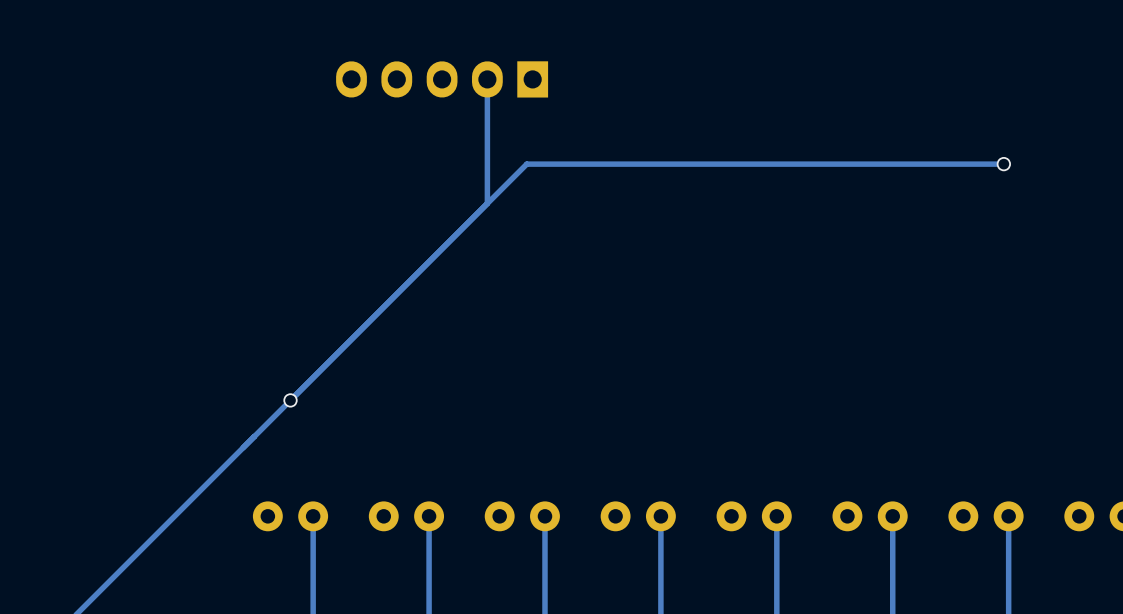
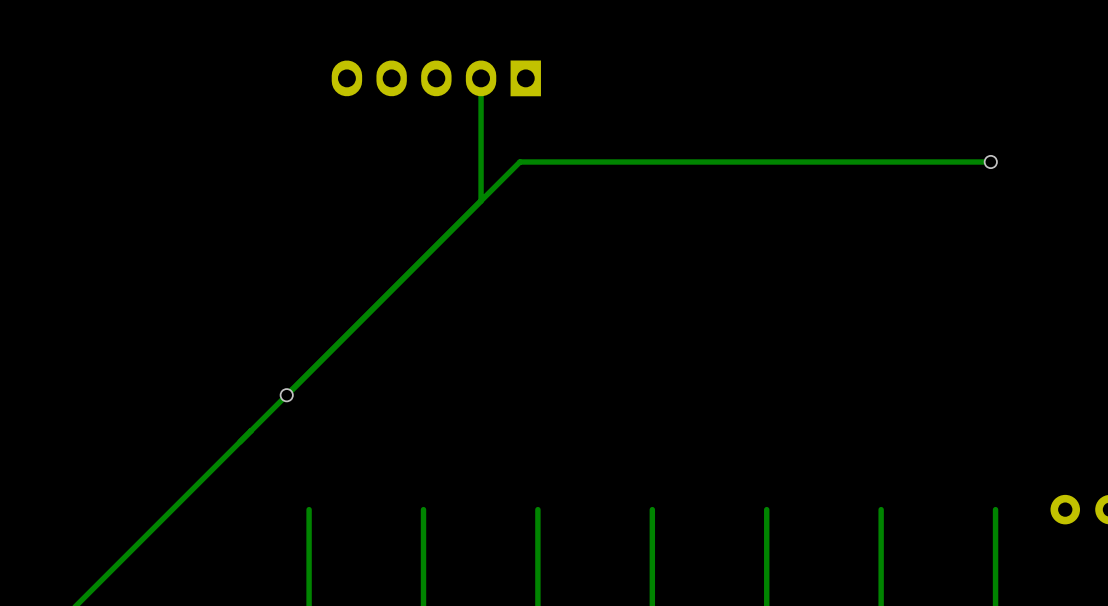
part: (290, 516) -> none
part: (406, 516) -> none
part: (522, 516) -> none
part: (638, 516) -> none
part: (754, 516) -> none
part: (870, 516) -> none
part: (986, 516) -> none

